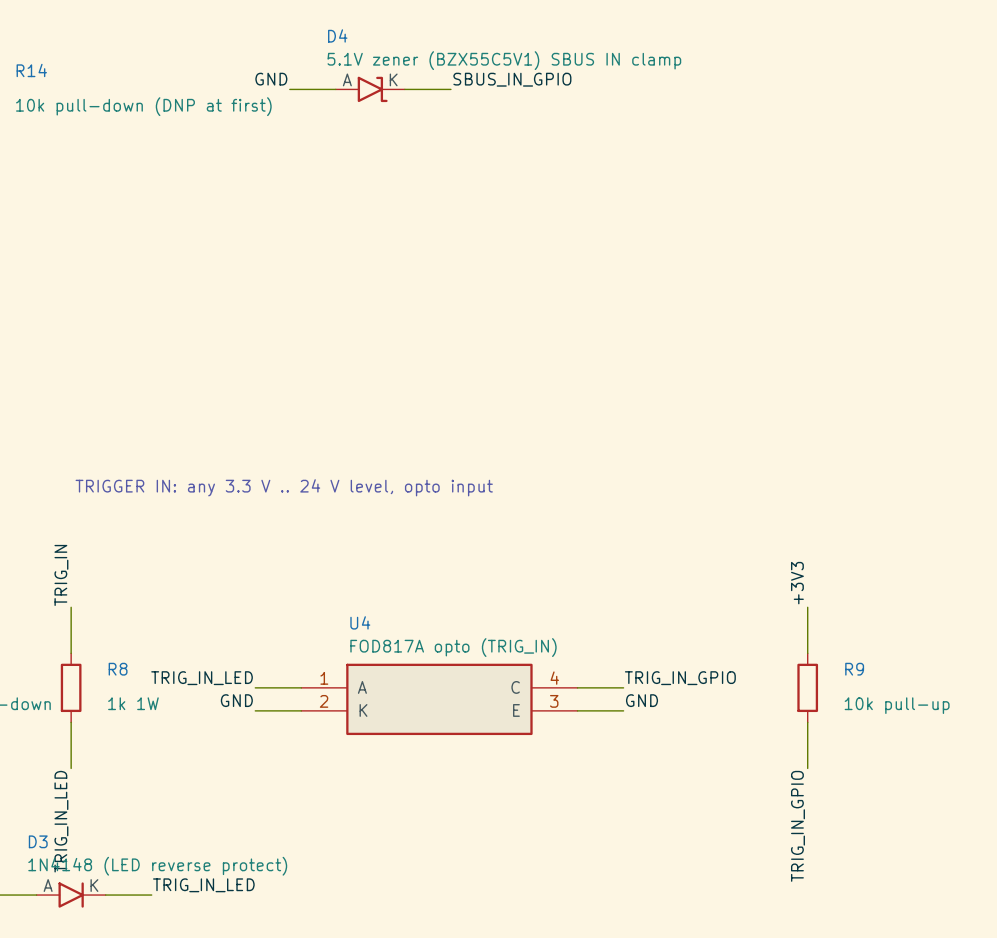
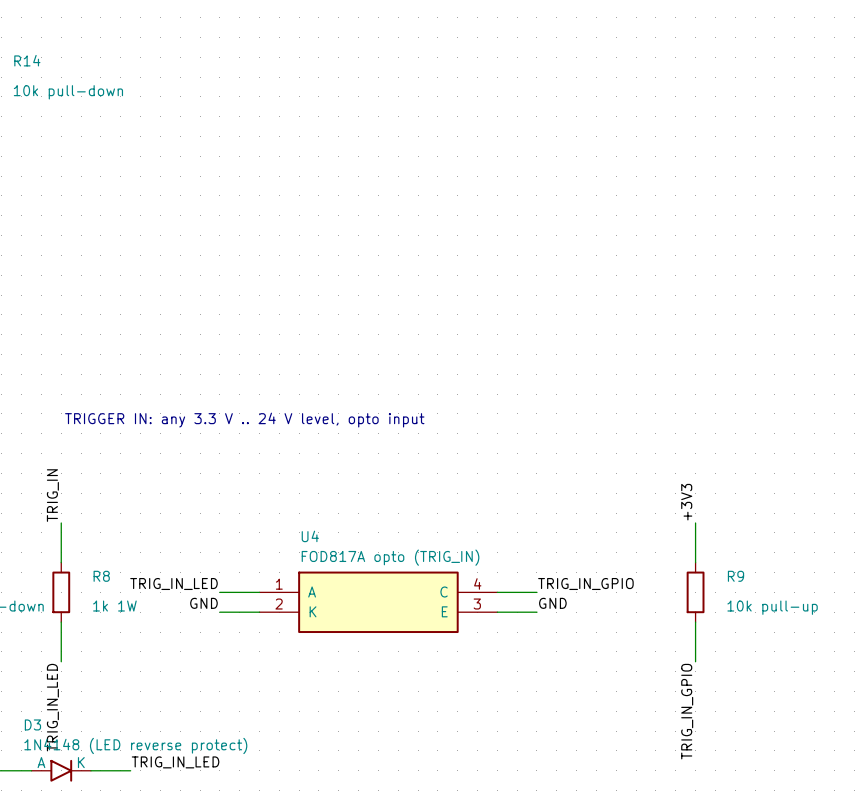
label: GND (271, 79) -> none
label: SBUS_IN_GPIO (512, 79) -> none
wire: (289, 89) (335, 89) -> none
D4: 5.1V zener (BZX55C5V1) SBUS IN clamp (370, 89) -> none
wire: (404, 89) (450, 89) -> none
R14 value: 10k pull-down (DNP at first) (143, 106) -> 10k pull-down (68, 92)

